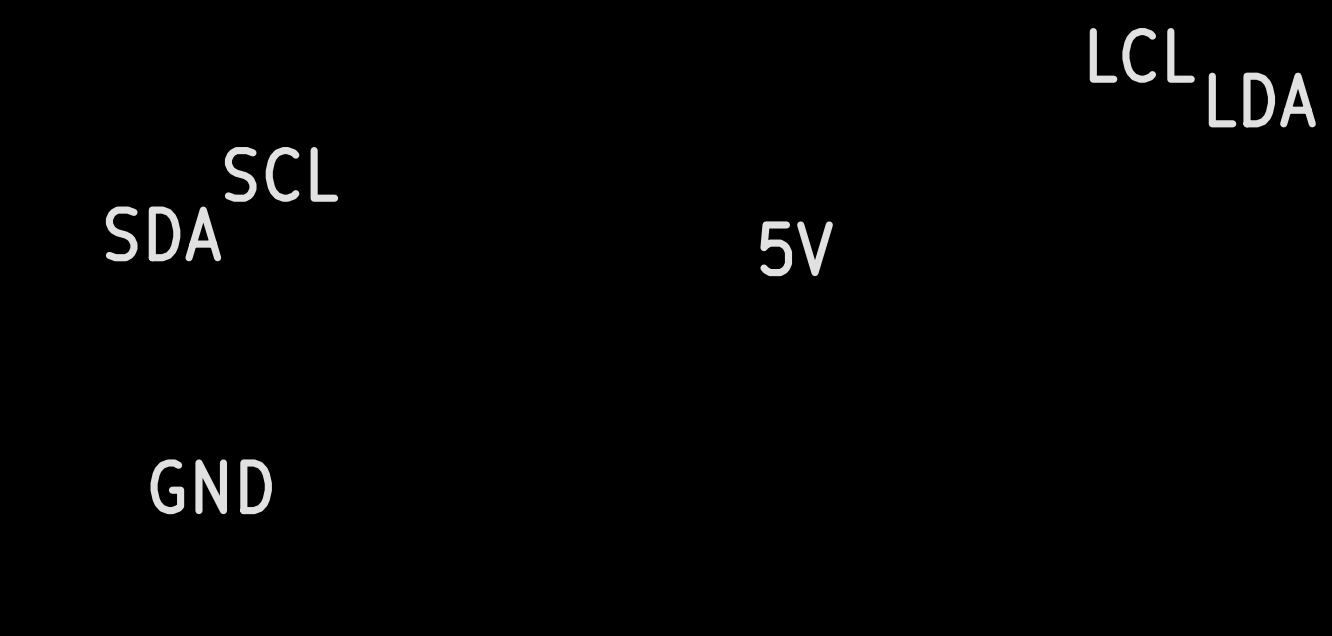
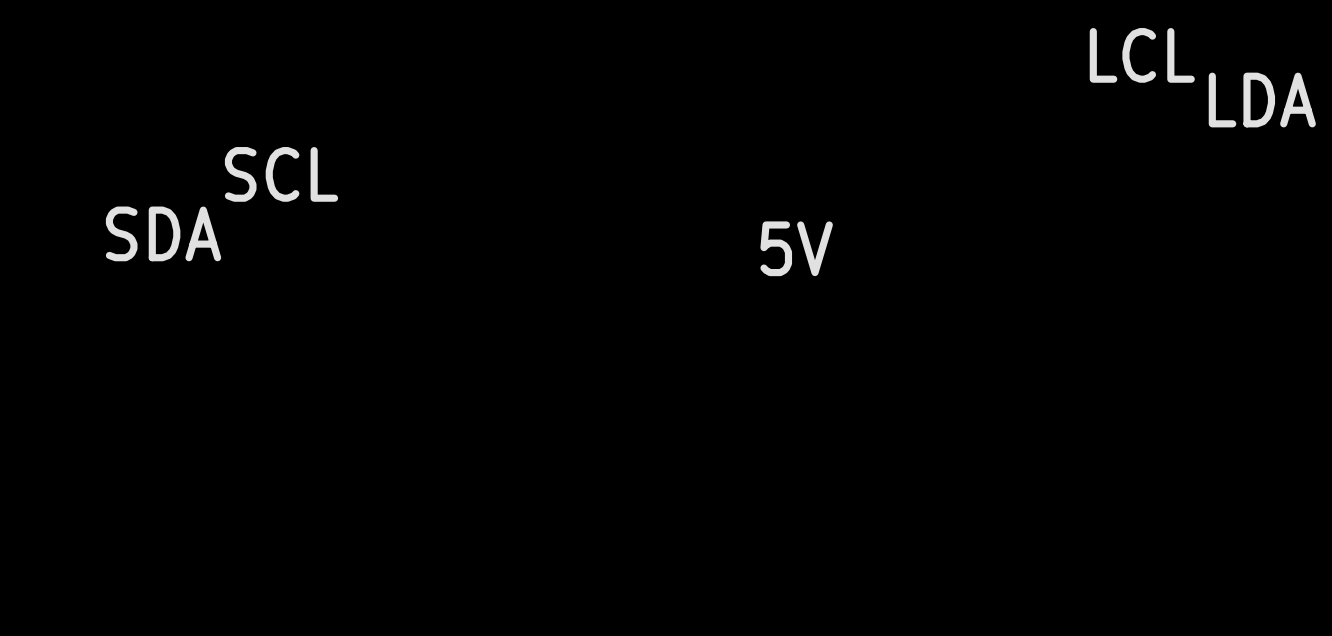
text: GND (211, 486) -> none

